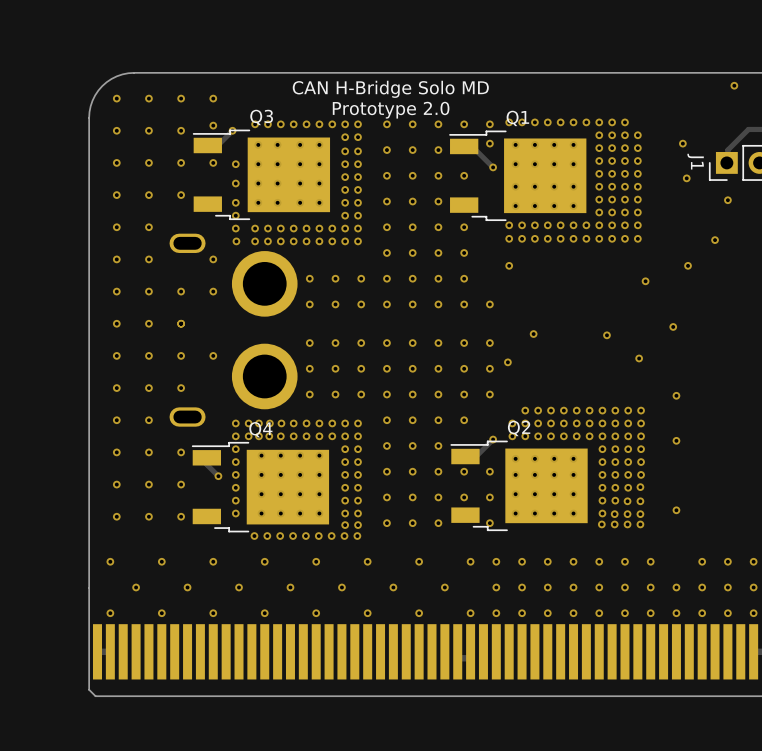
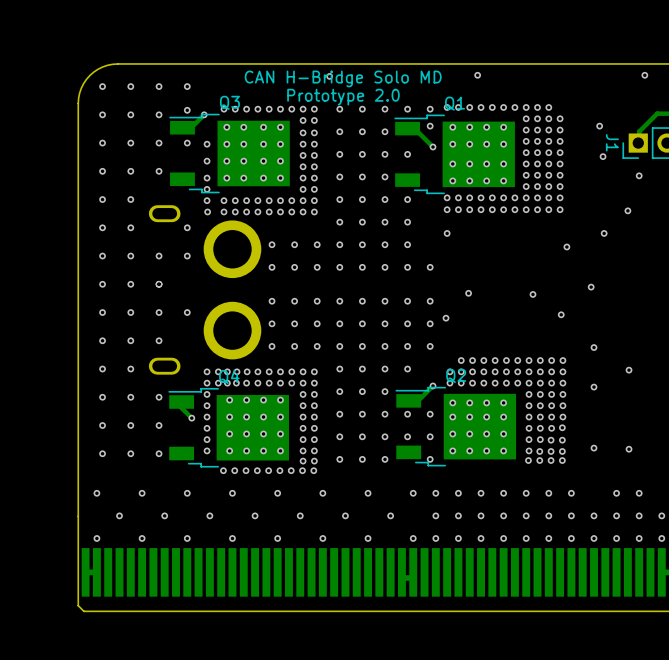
via: none -> (477, 75)
via: none -> (329, 76)
via: none -> (629, 370)
via position: (753, 561) -> (629, 449)

